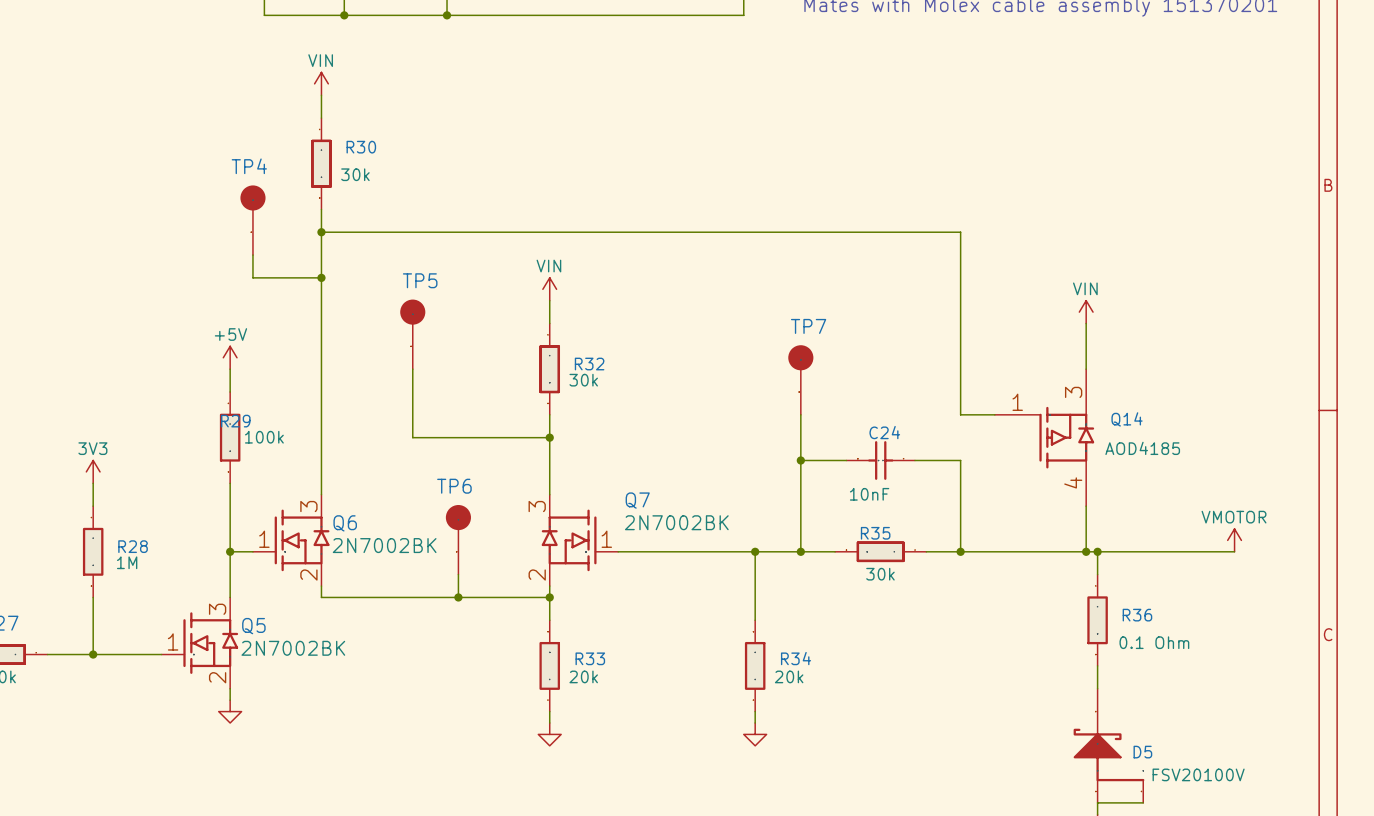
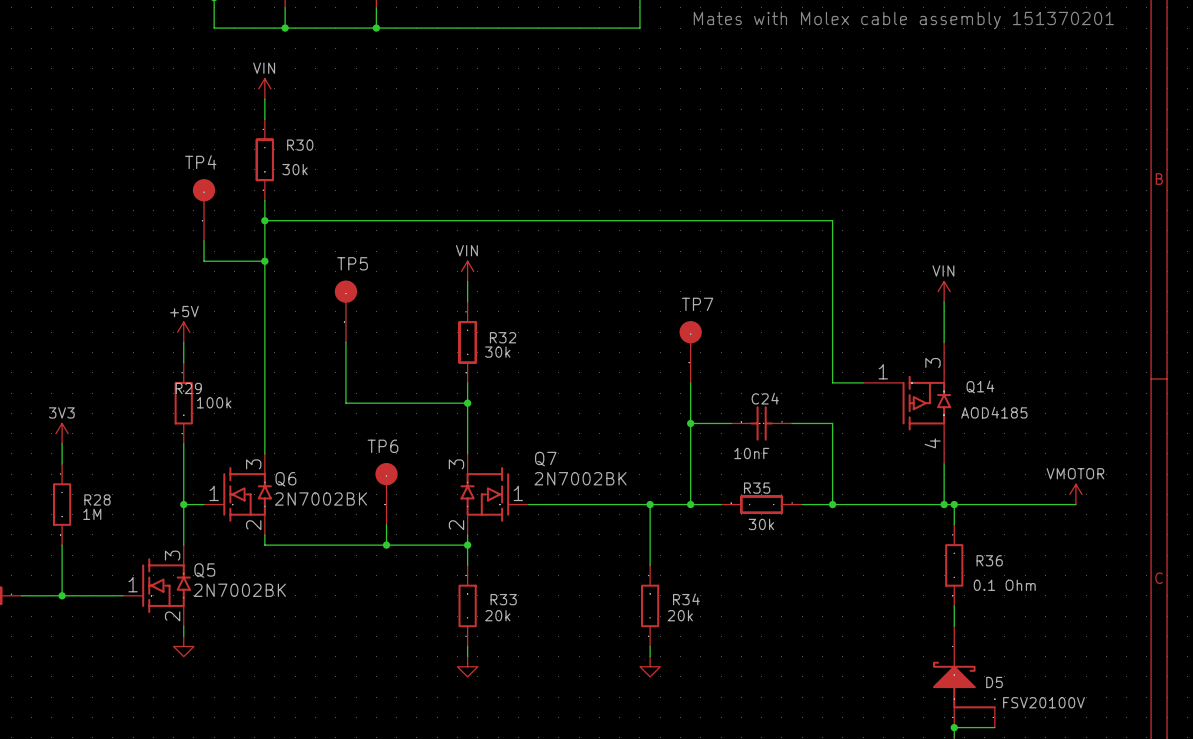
junction: none -> (954, 727)

